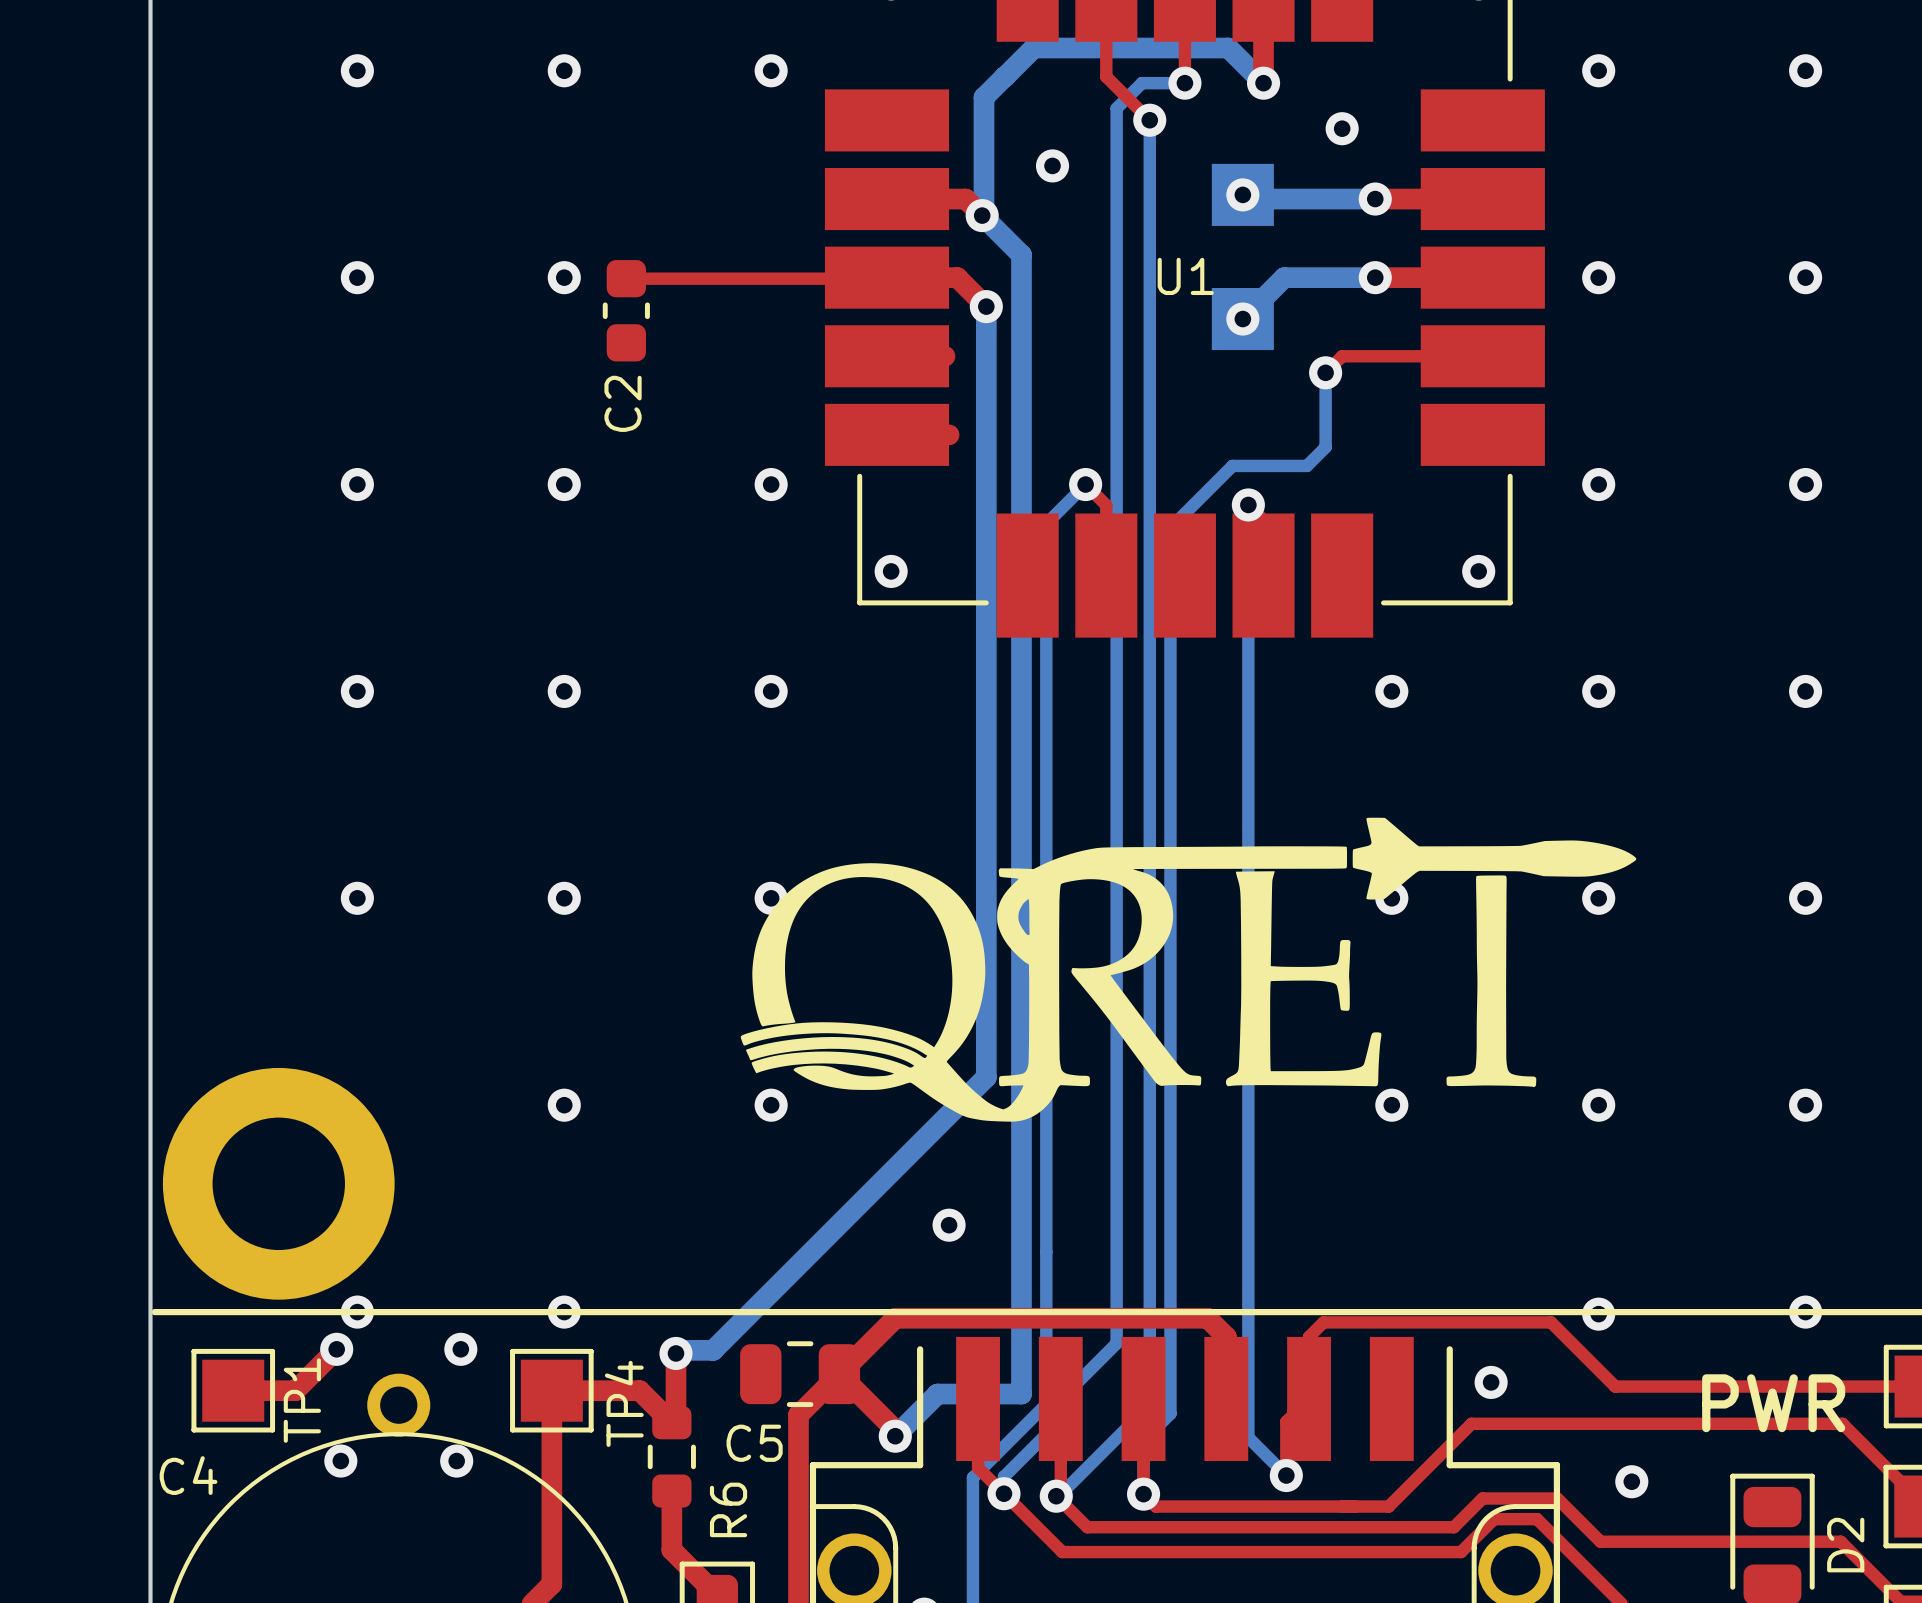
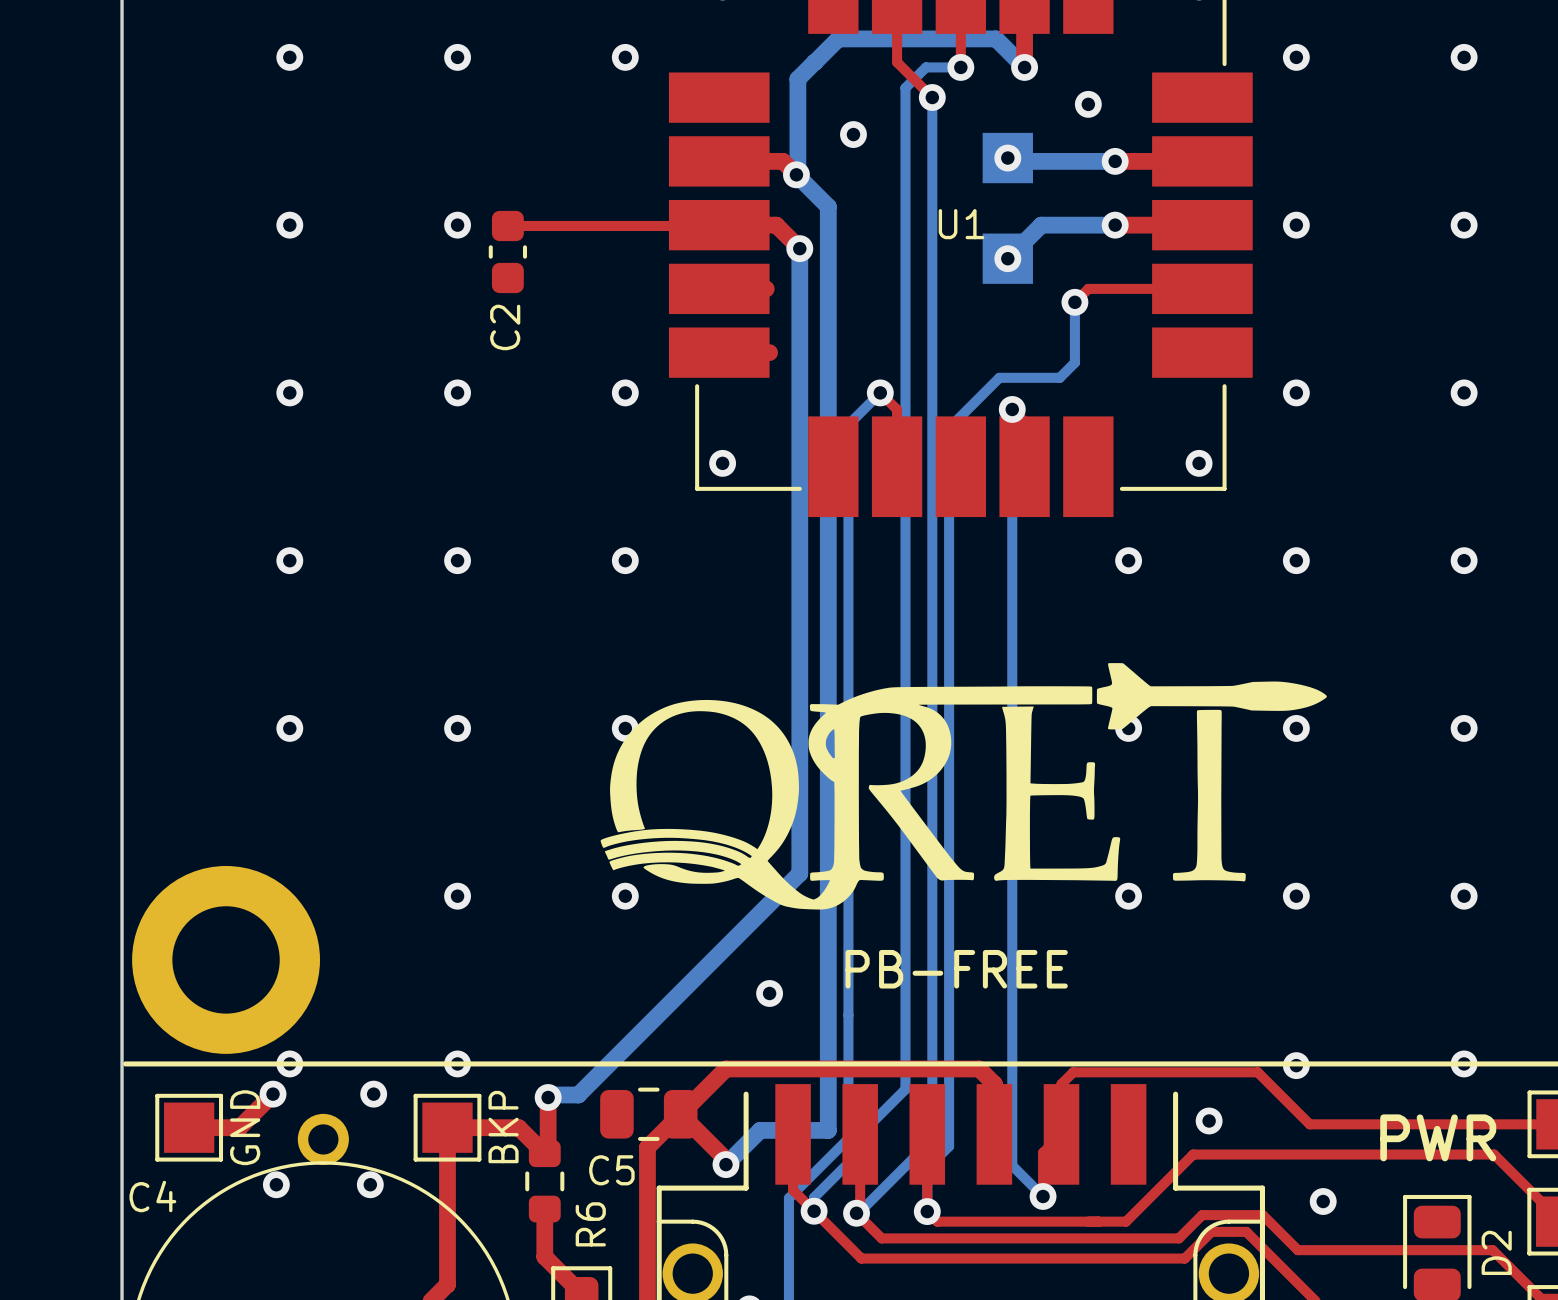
text: none -> PB-FREE (956, 969)
TP4 value: none -> BKP (503, 1127)
TP1 value: none -> GND (245, 1127)
TP1 name: TP1 (302, 1400) -> none
TP4 name: TP4 (624, 1403) -> none

